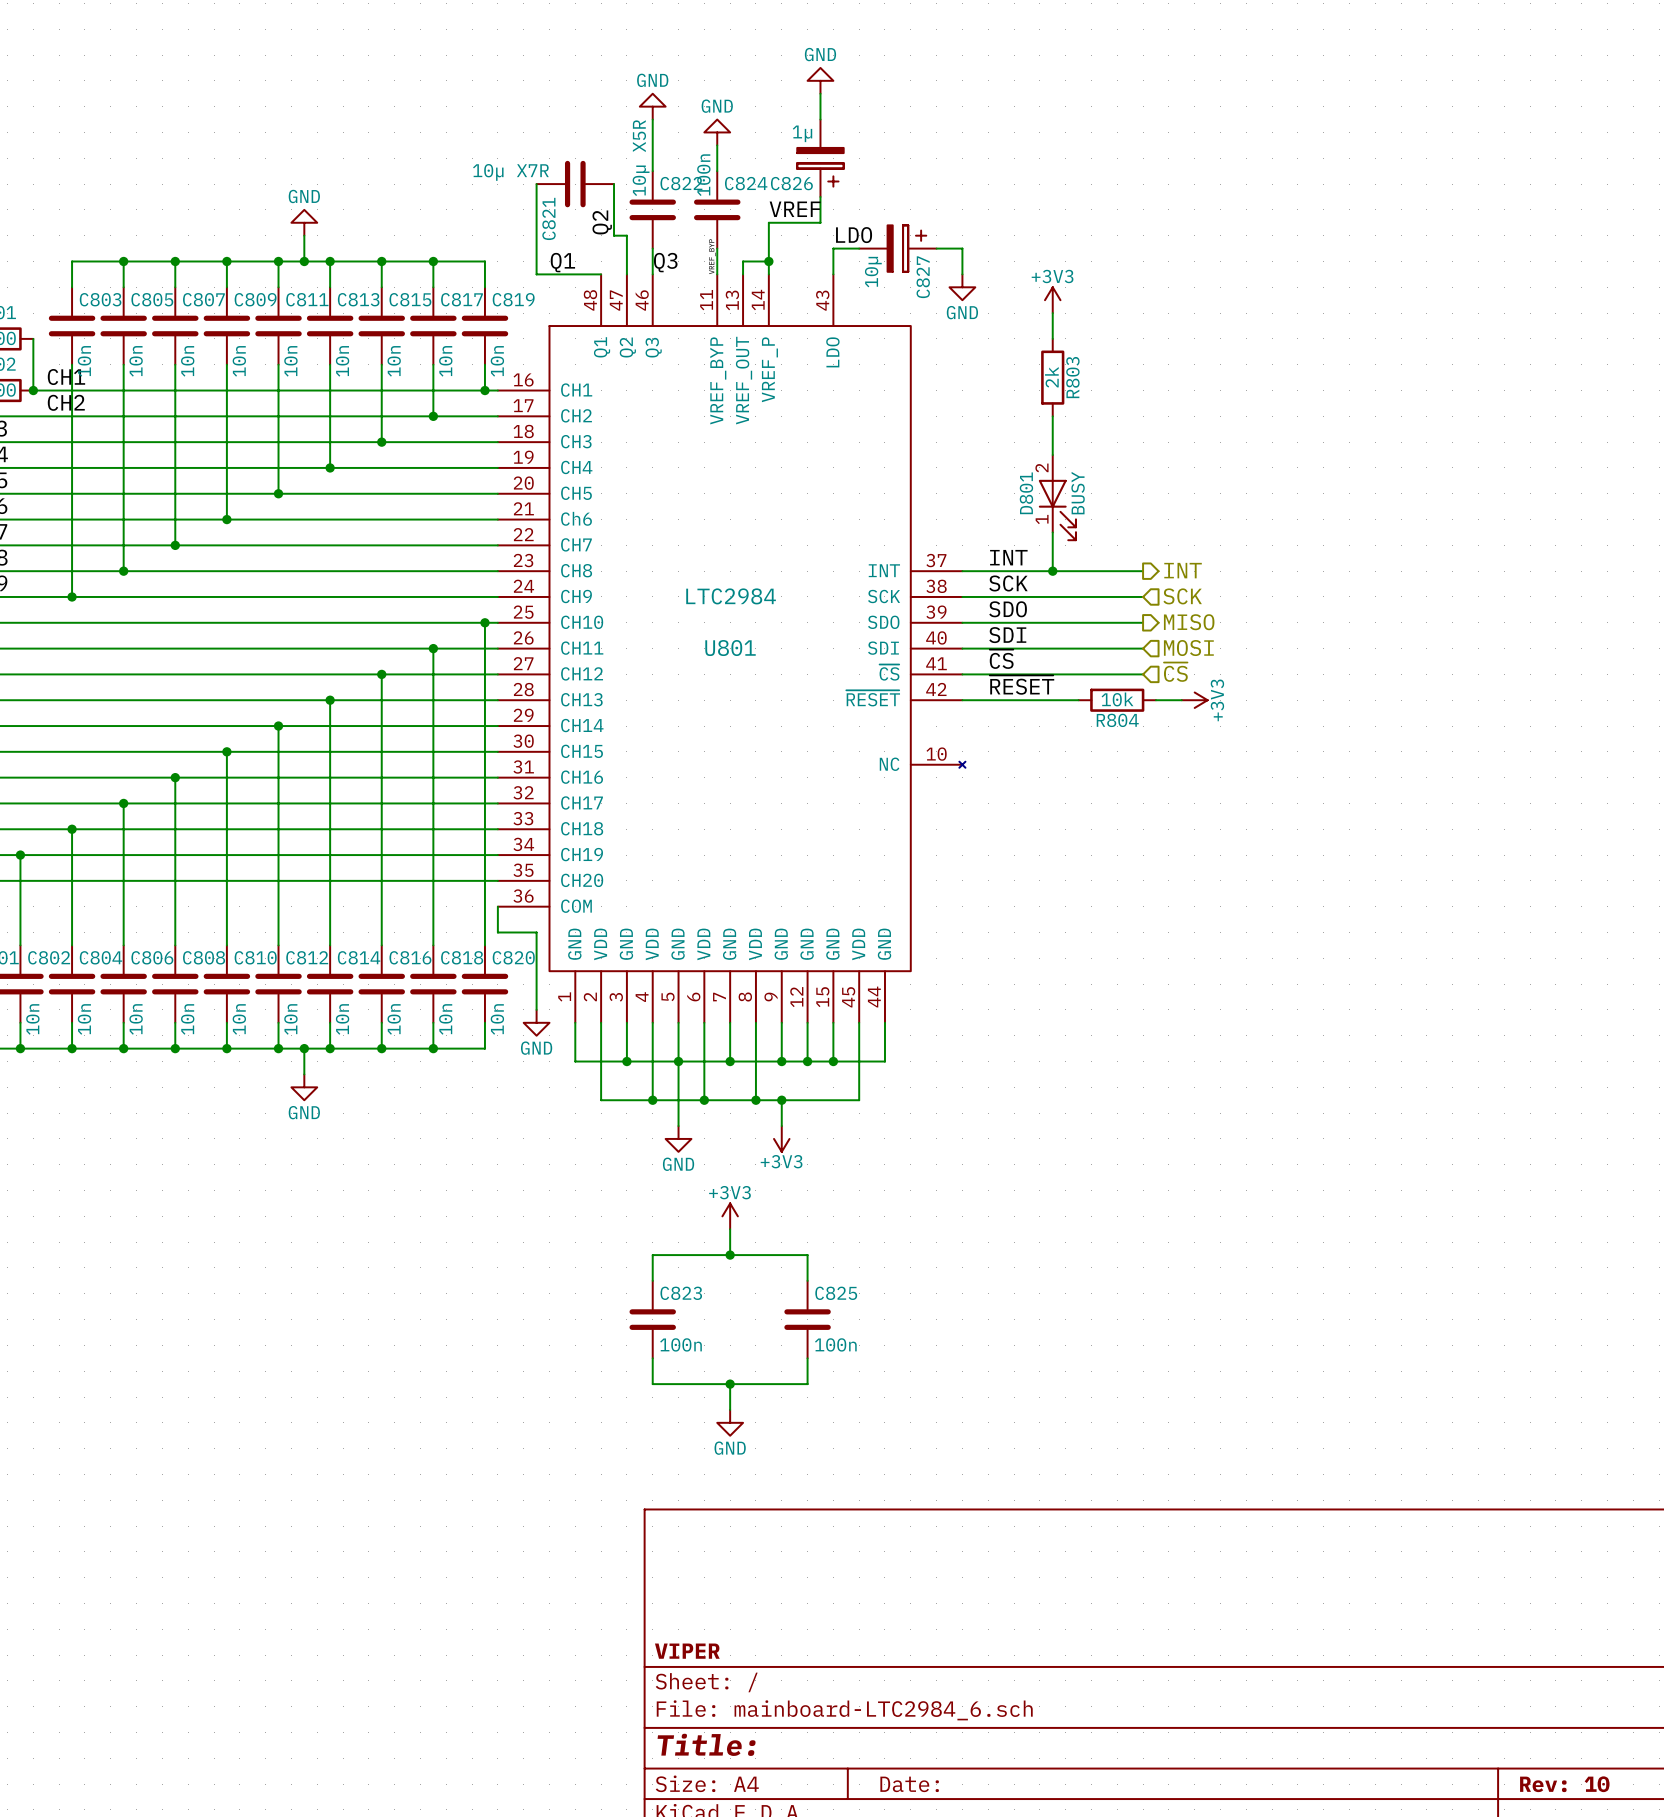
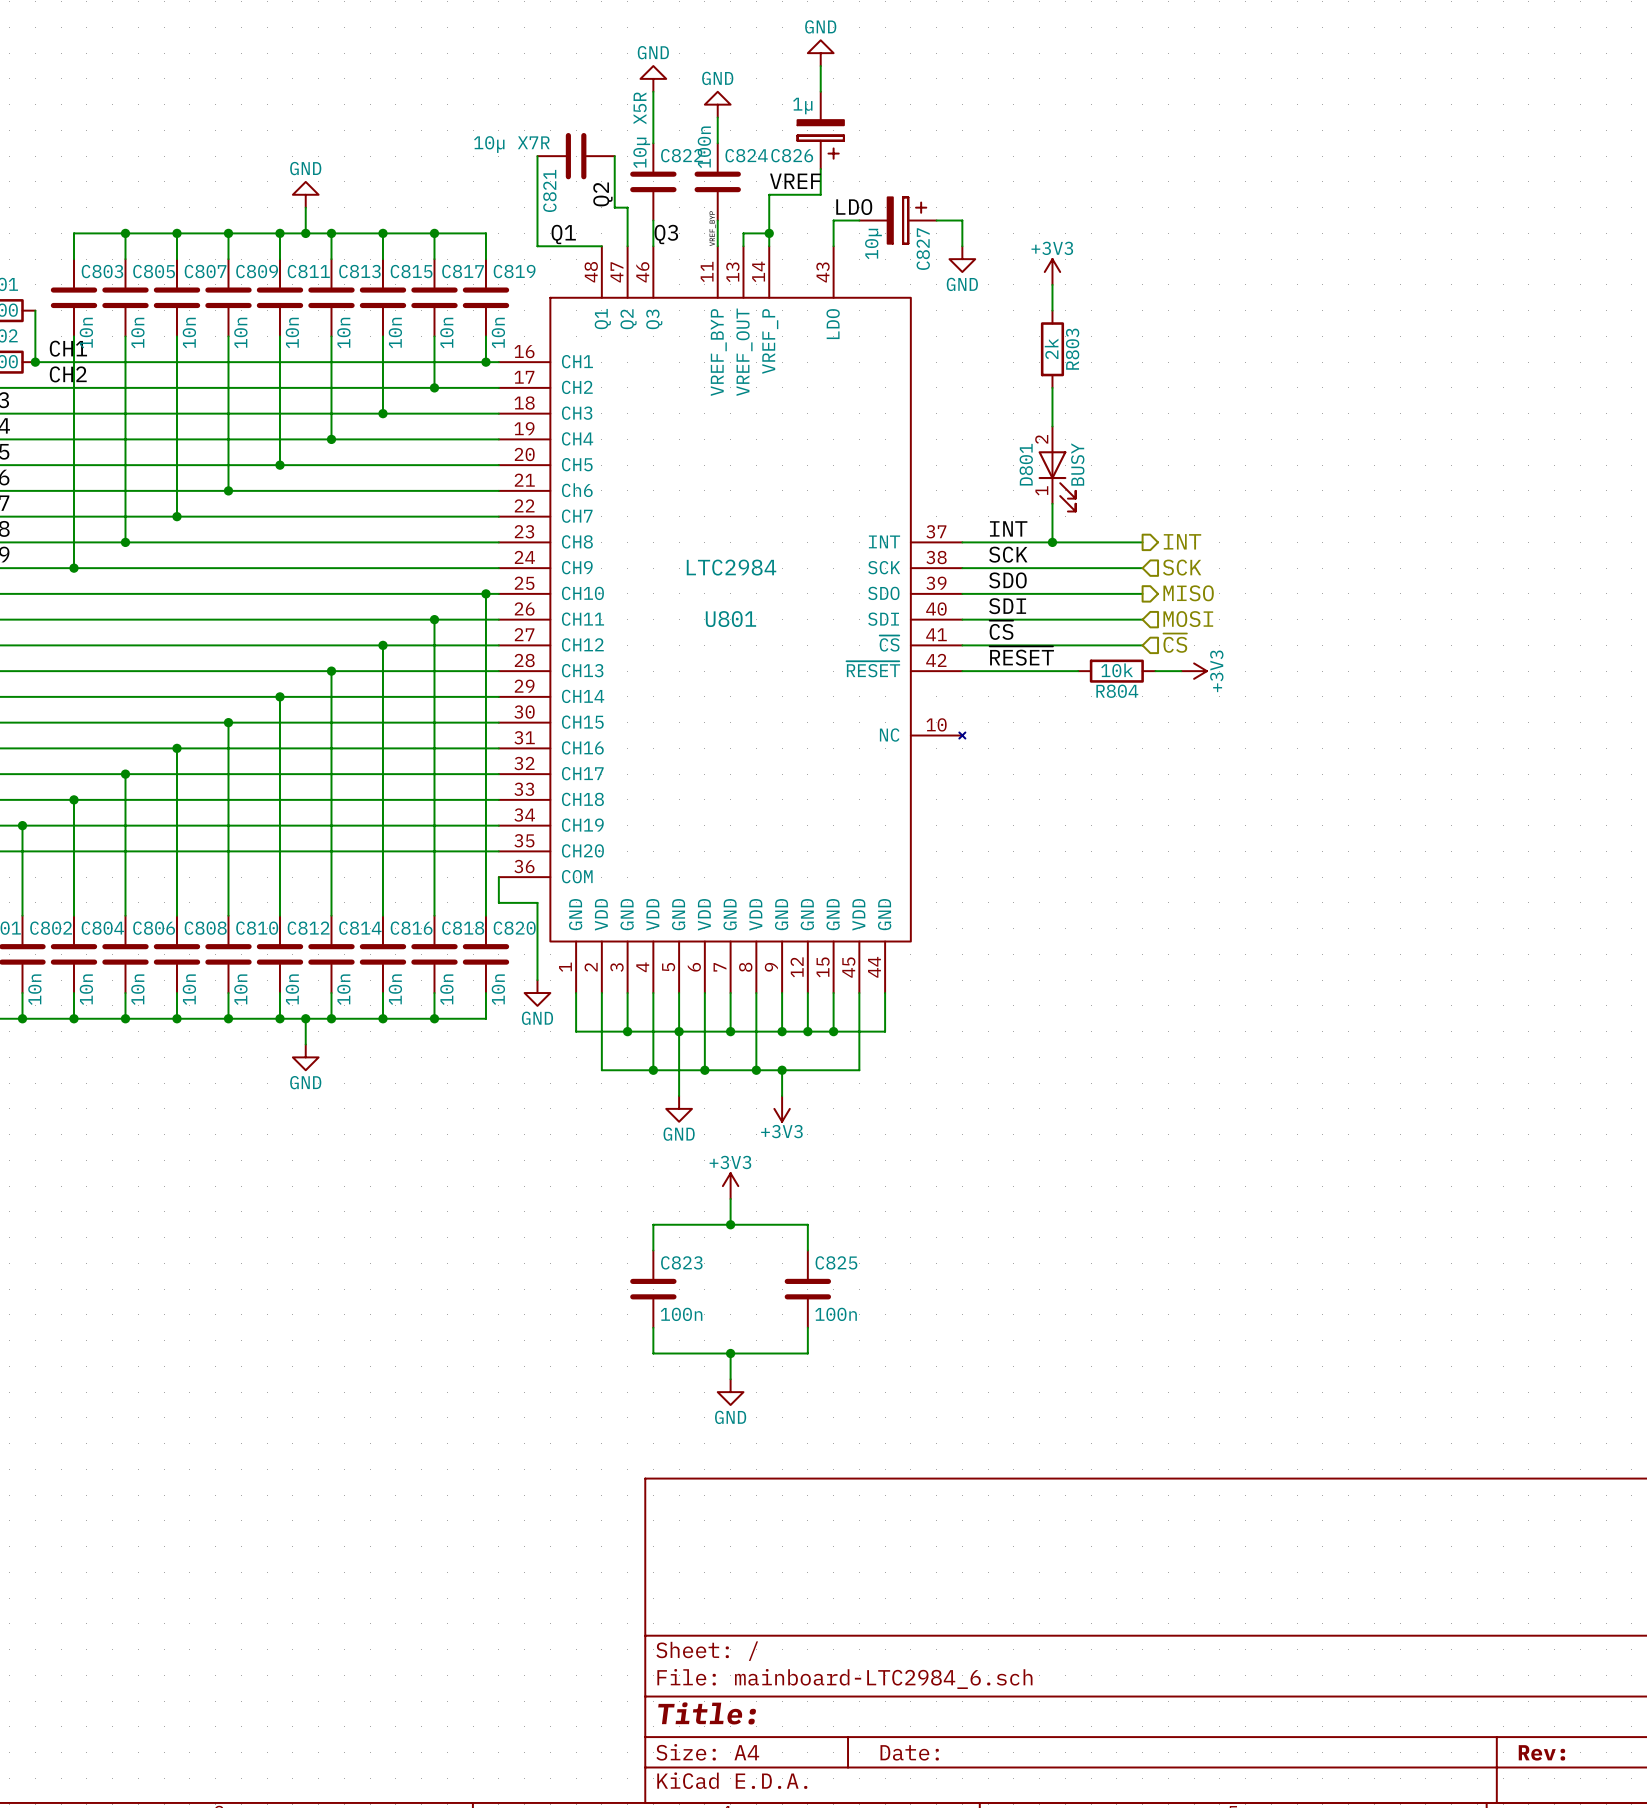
title block: VIPER (687, 1651) -> none
title block: Rev: 10 (1564, 1784) -> Rev: (1541, 1752)

